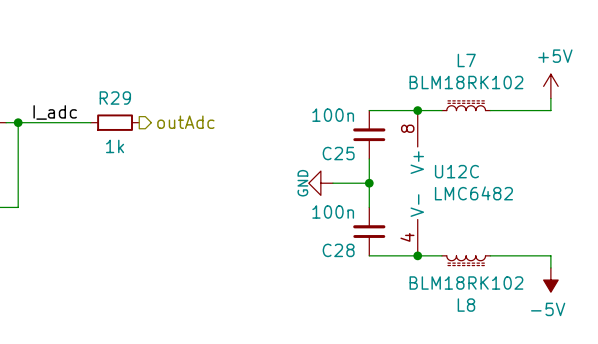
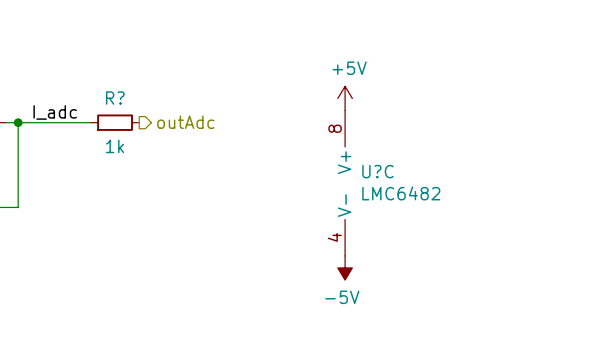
power symbol position: +5V (550, 86) -> +5V (345, 98)
R29 name: R29 (115, 98) -> R? (115, 98)
wire: (550, 98) (550, 110) (490, 110) -> none
L7: BLM18RK102 (466, 105) -> none
wire: (369, 110) (441, 110) -> none
junction: (417, 110) -> none
C25: 100n (369, 134) -> none
wire: (369, 159) (369, 207) -> none
power symbol: GND (320, 183) -> none
wire: (332, 183) (369, 183) -> none
U?C: none -> LMC6482 (345, 183)
junction: (369, 183) -> none
U12C: LMC6482 (417, 183) -> none
C28: 100n (369, 231) -> none
wire: (369, 255) (441, 255) -> none
junction: (417, 255) -> none
wire: (490, 255) (550, 255) (550, 267) -> none
L8: BLM18RK102 (466, 260) -> none
power symbol position: -5V (550, 280) -> -5V (345, 267)

